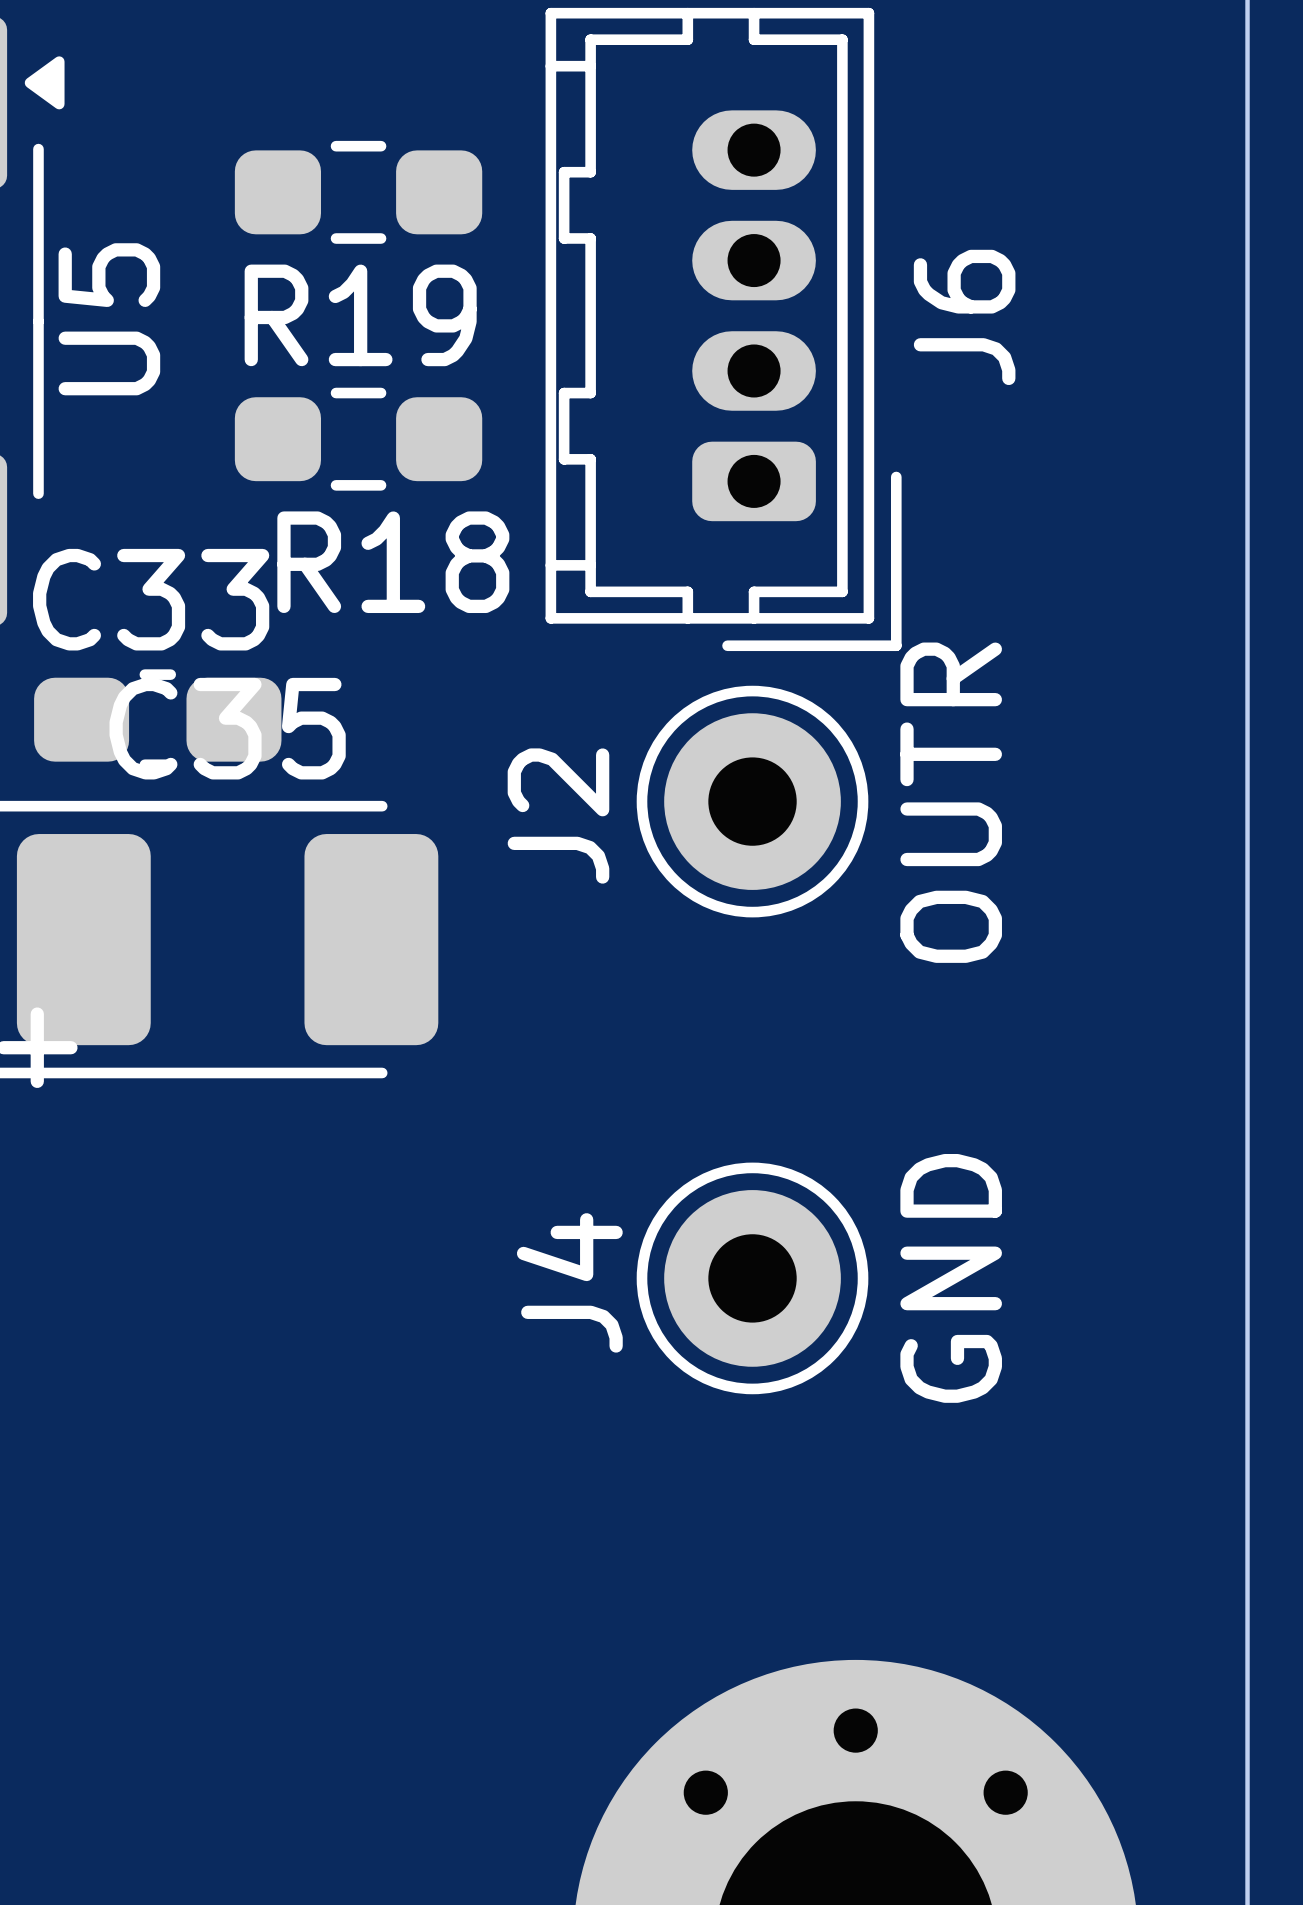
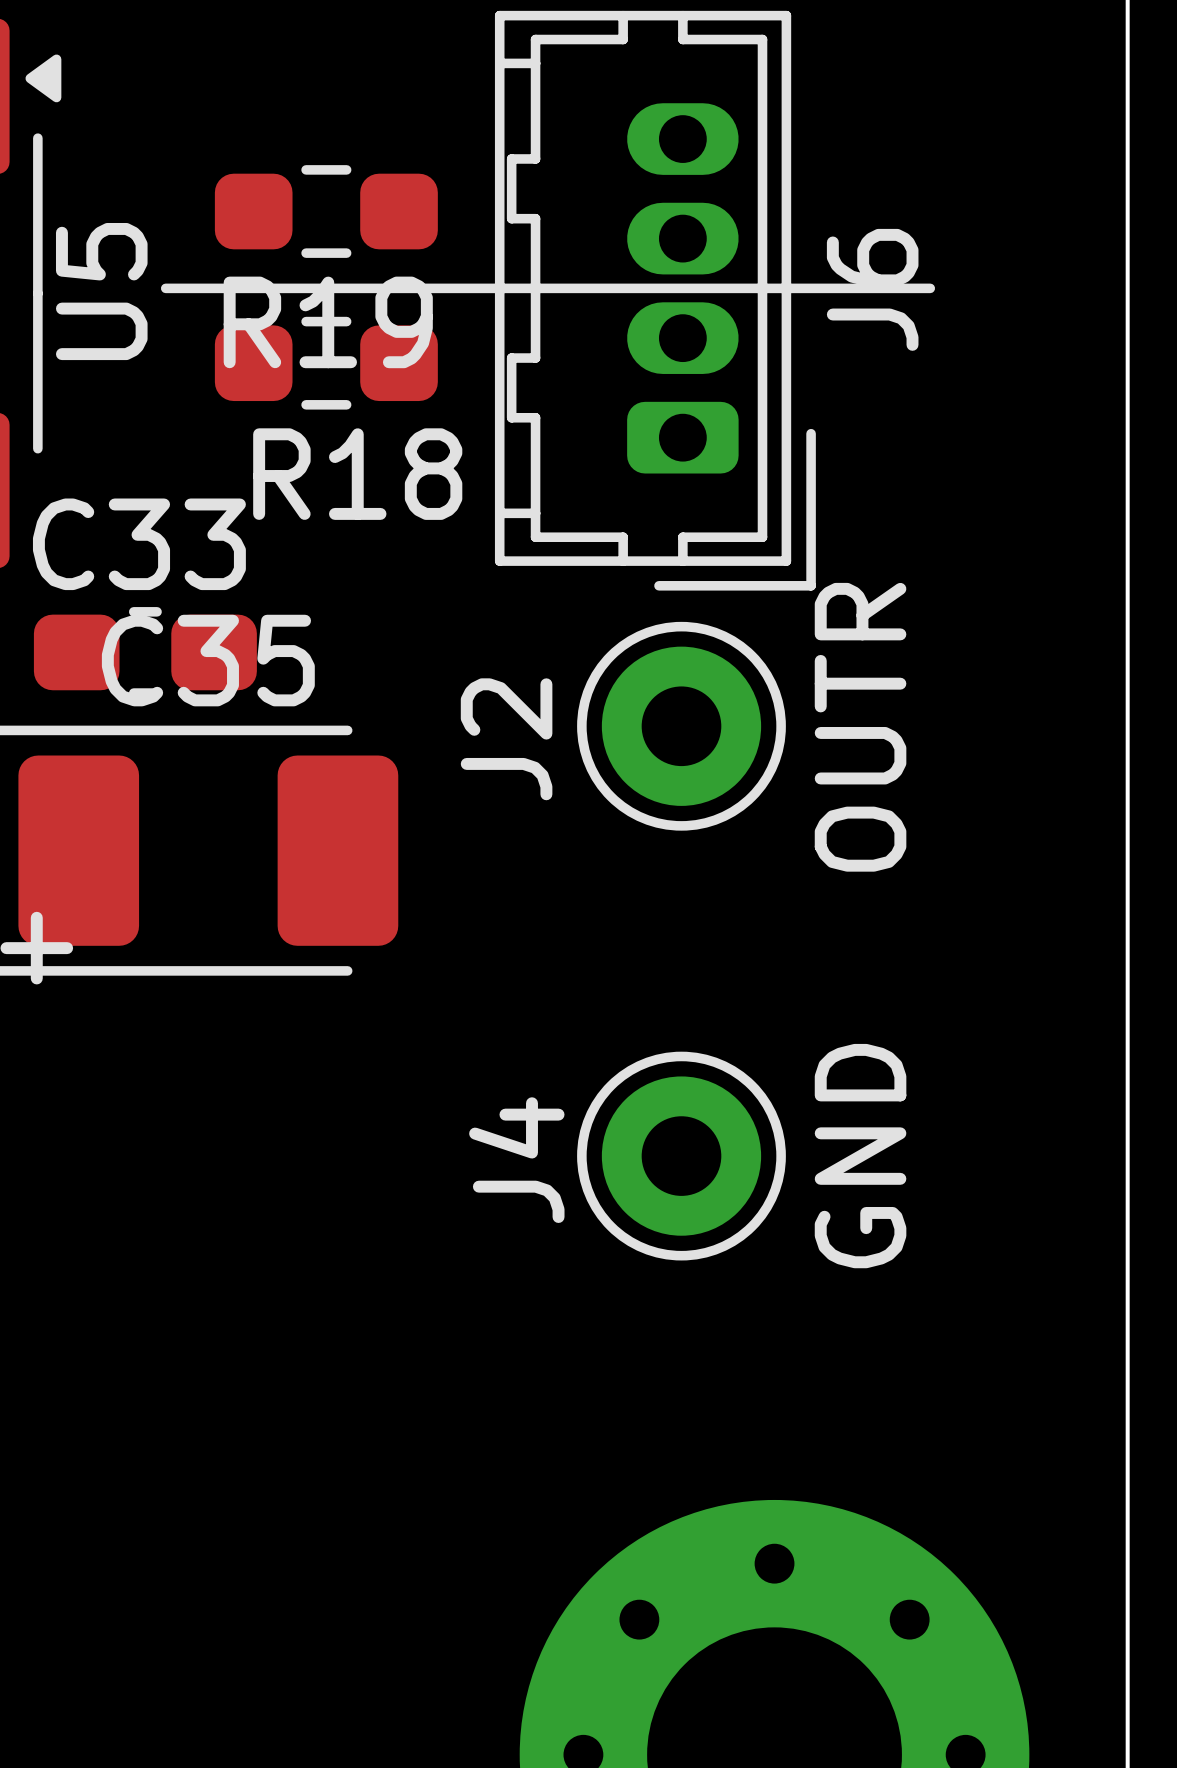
R19 position: (358, 192) -> (326, 211)
line: none -> (165, 288) (930, 288)
R18 position: (358, 439) -> (326, 363)

